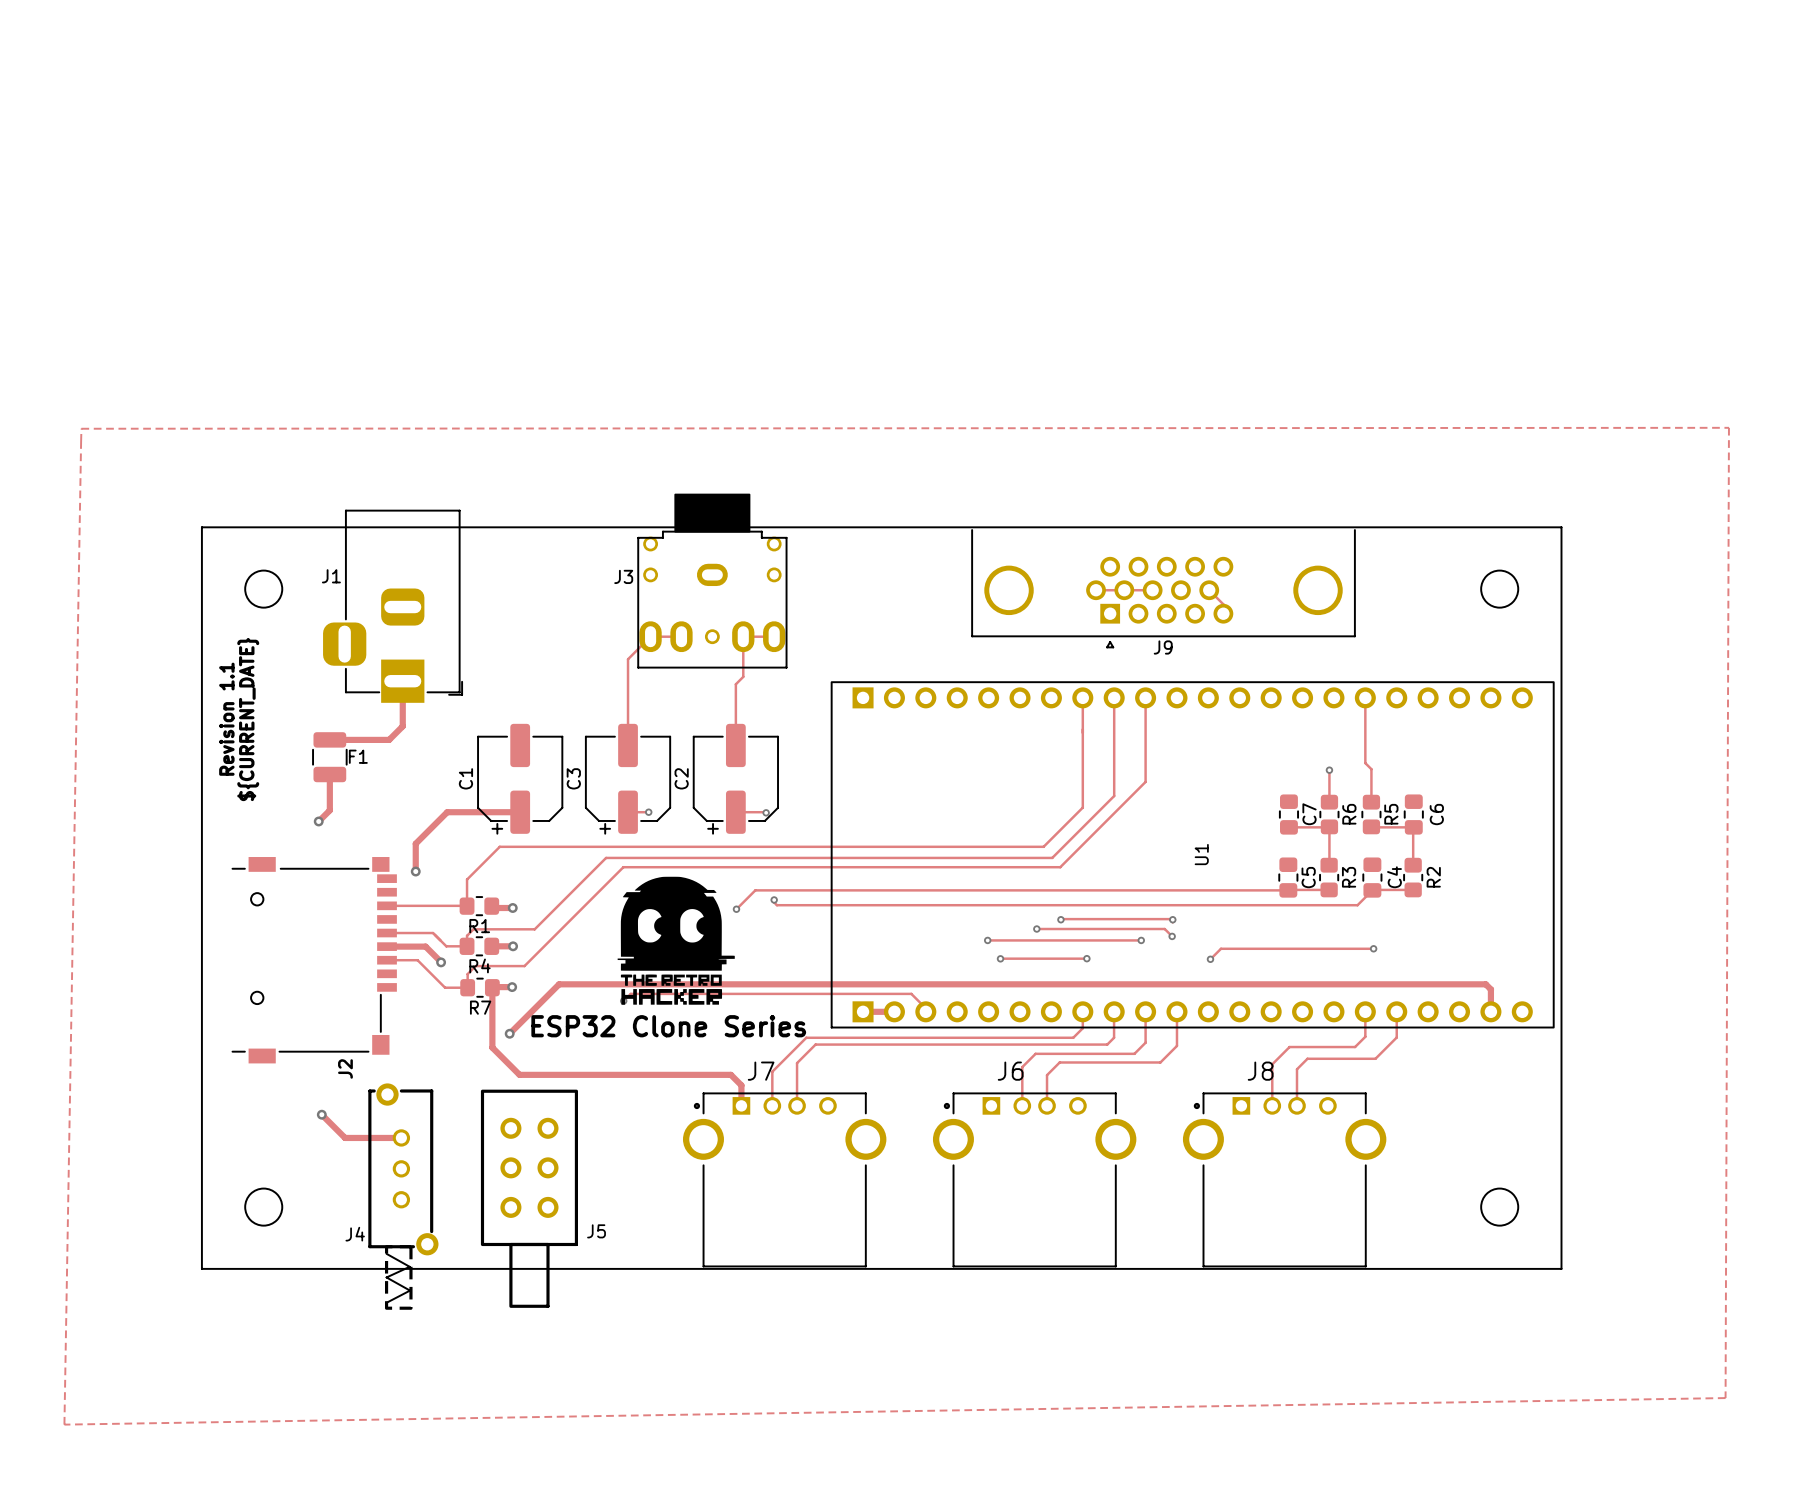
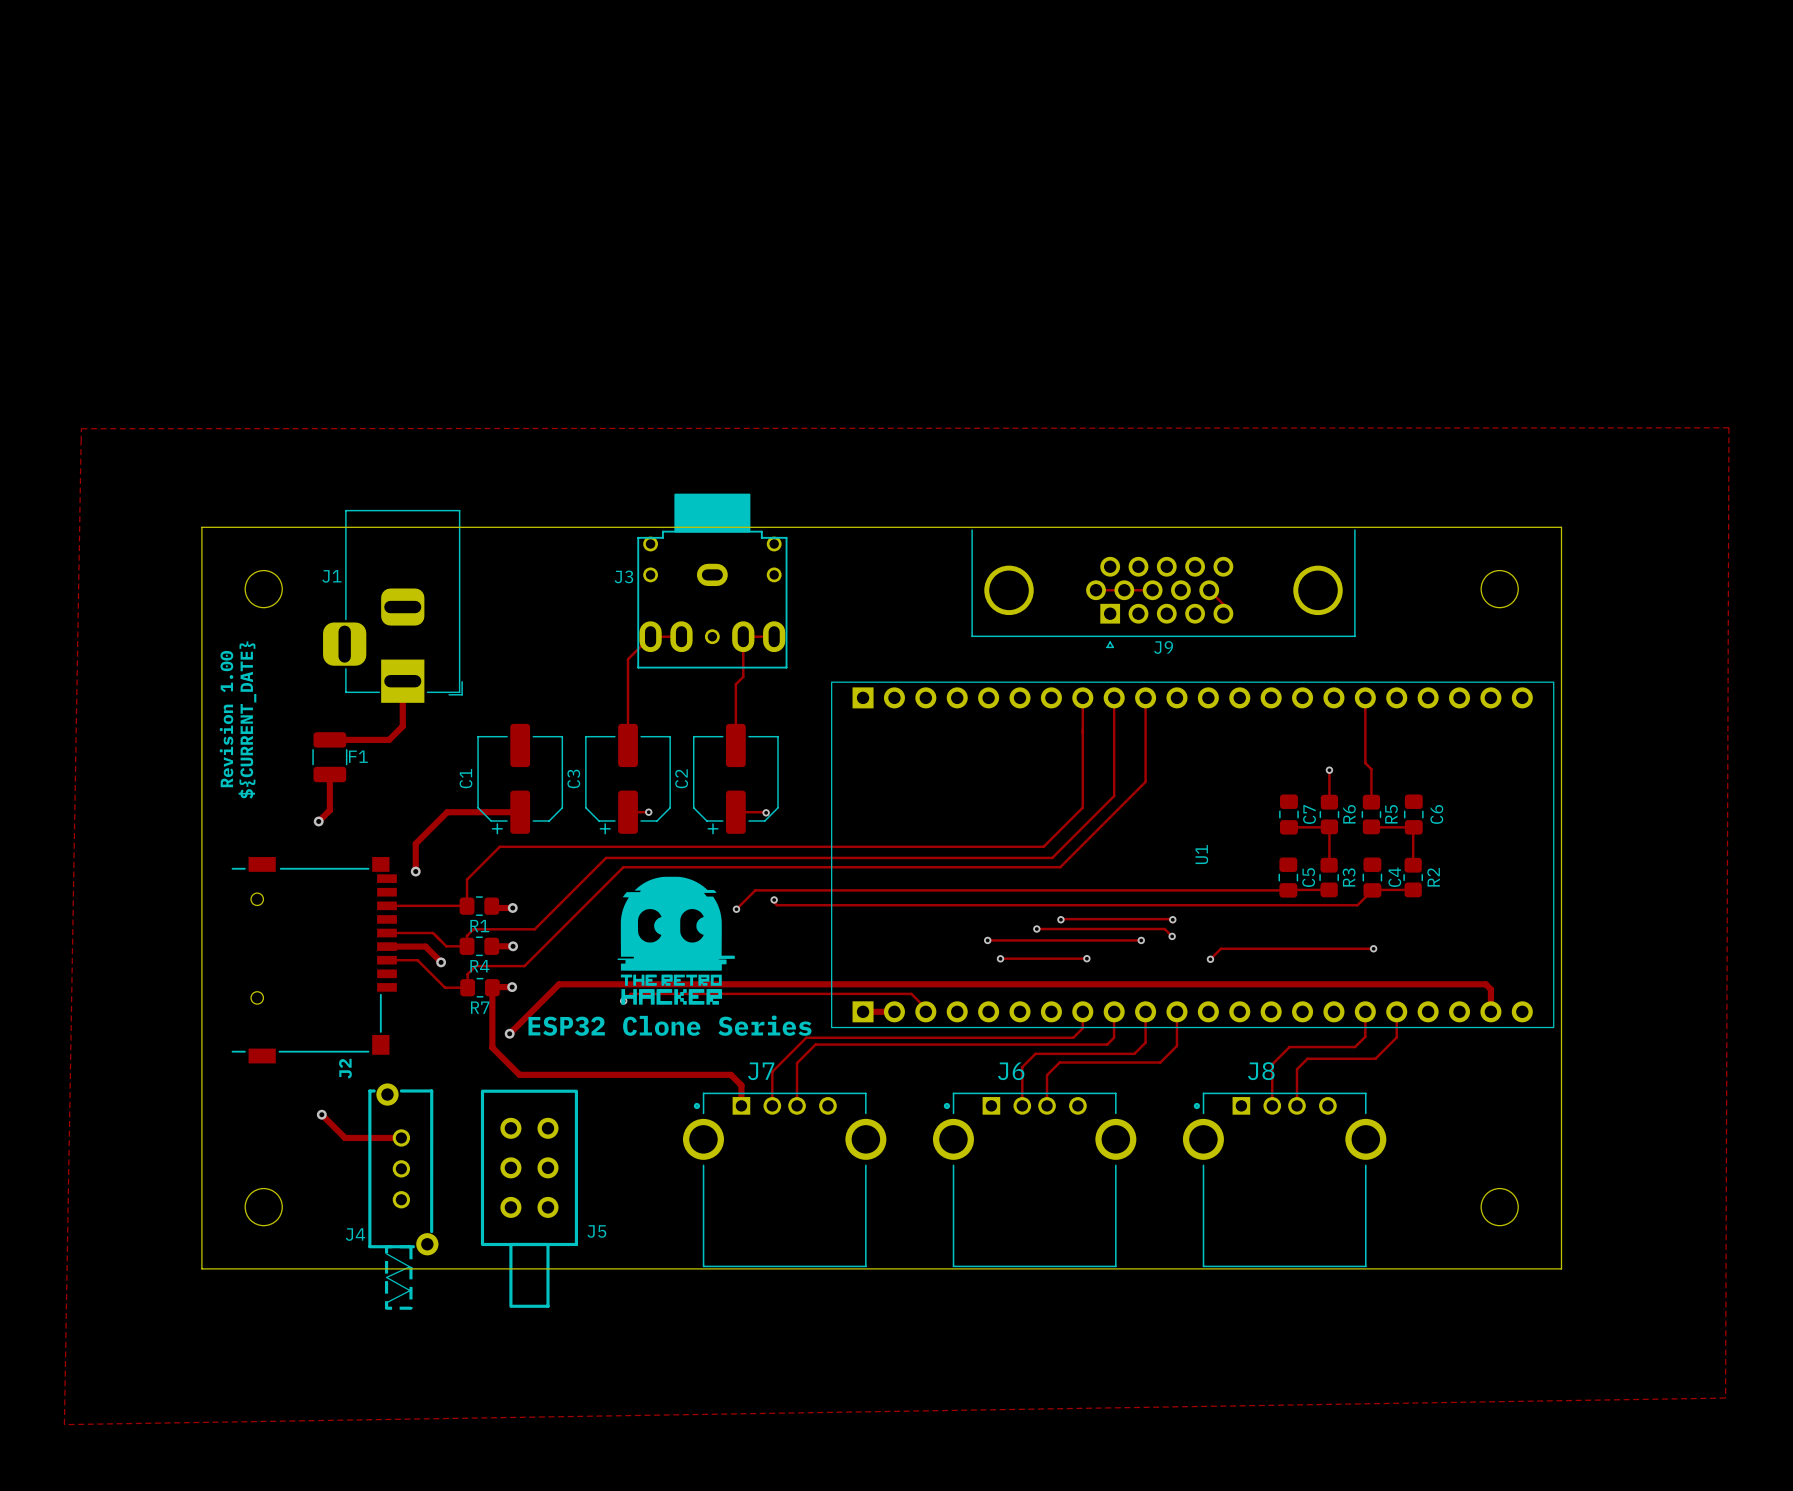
text: Revision 1.1 (226, 719) -> Revision 1.00 (226, 719)

